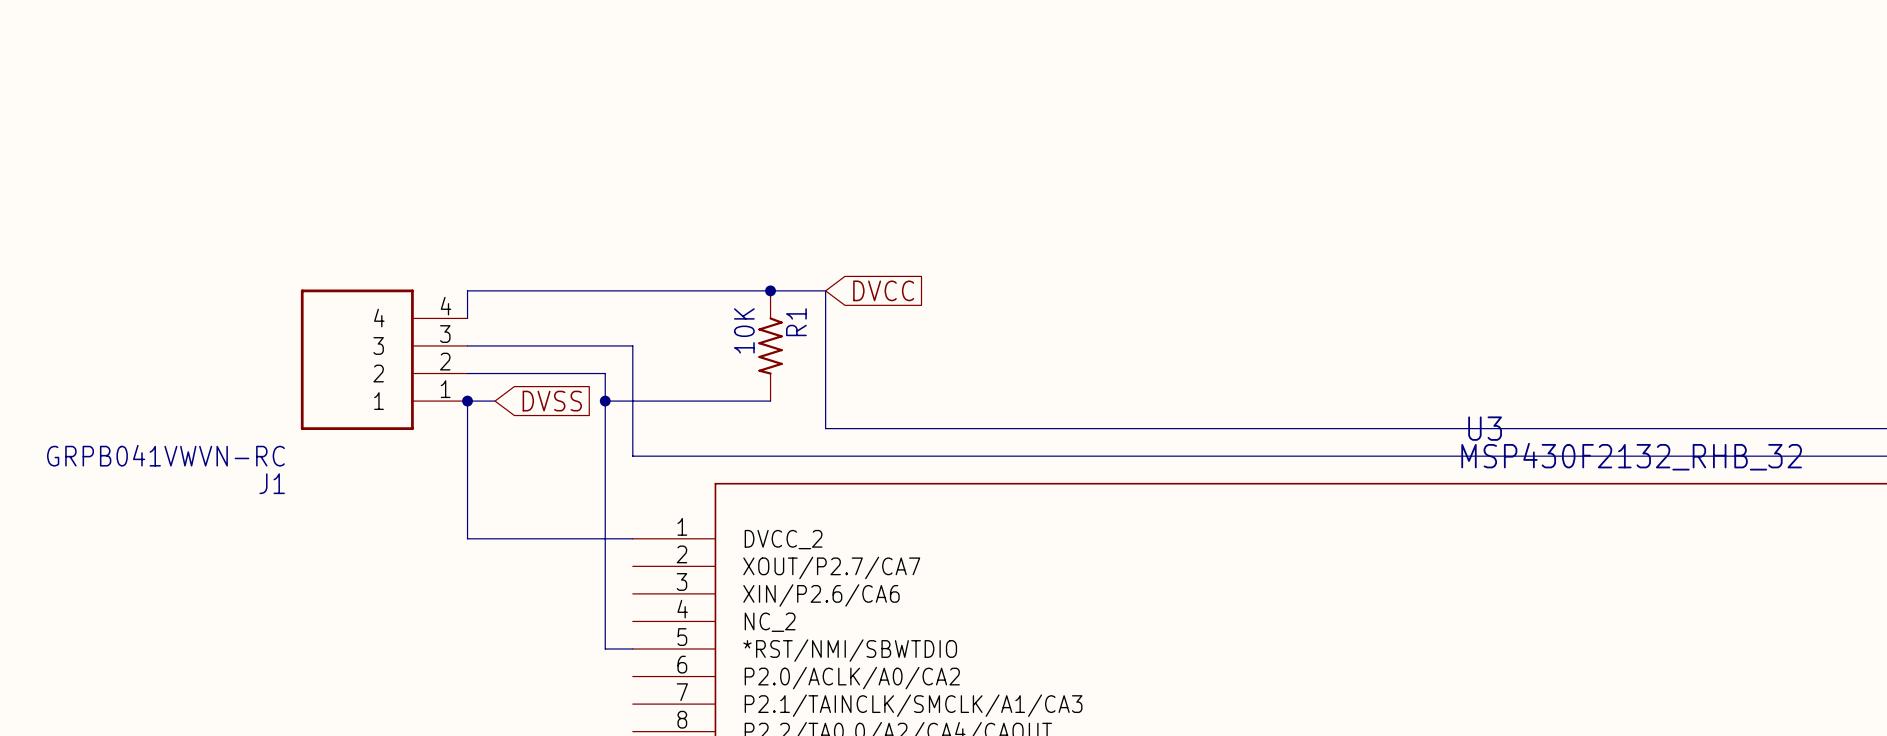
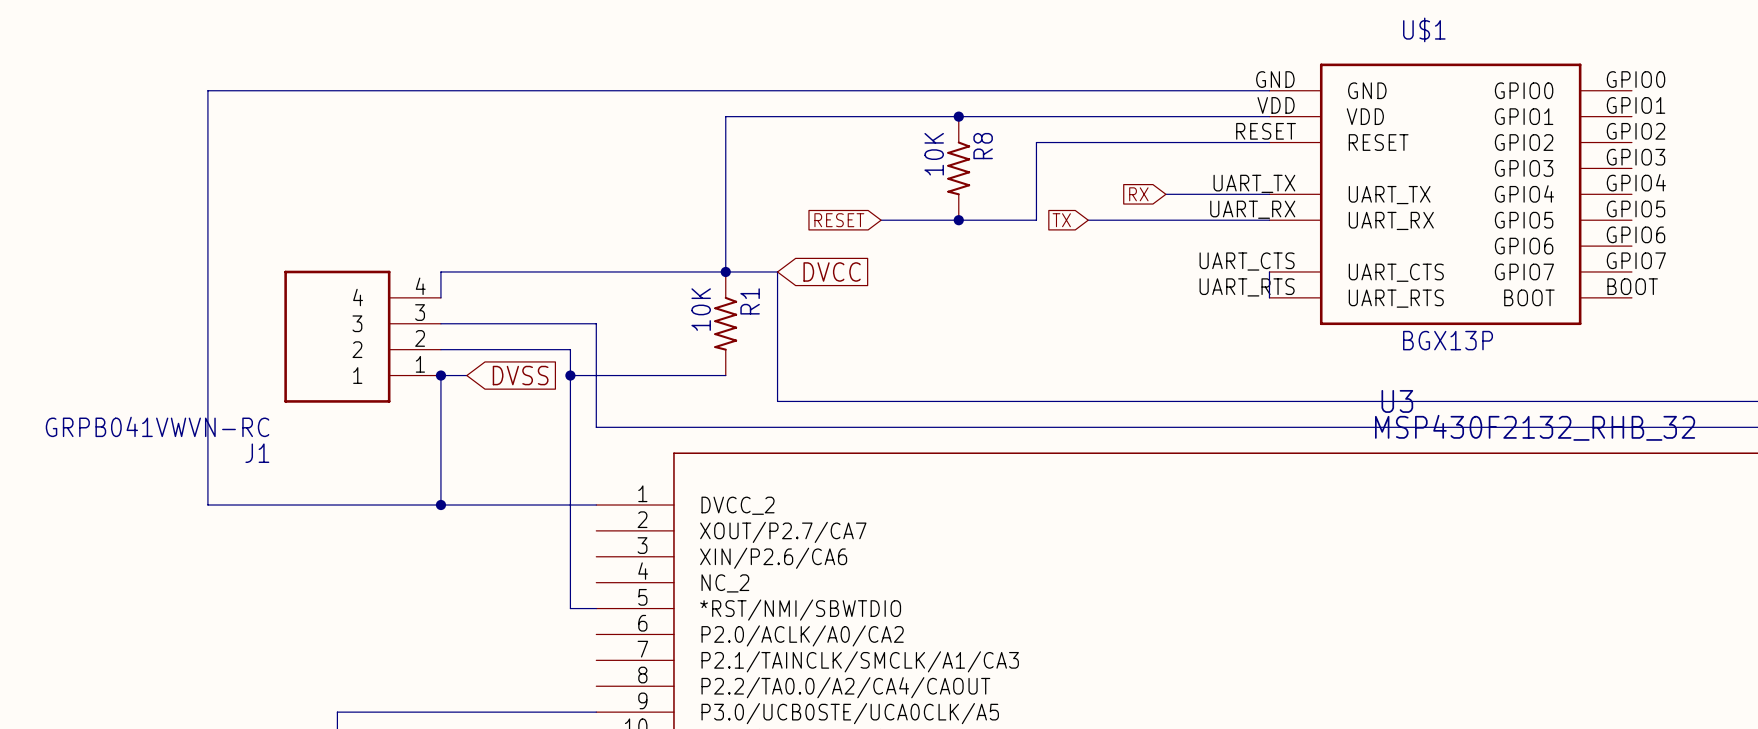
wire: none -> (1269, 90) (207, 90) (207, 505) (440, 505)
junction: none -> (958, 116)
wire: none -> (1269, 116) (725, 116) (725, 271)
wire: none -> (1269, 142) (1036, 142) (1036, 220) (881, 220)
R8: none -> 10K (958, 168)
global label: none -> RX (1138, 194)
wire: none -> (1165, 194) (1269, 194)
U$1: none -> BGX13P (1450, 194)
global label: none -> RESET (839, 220)
junction: none -> (958, 220)
global label: none -> TX (1061, 220)
wire: none -> (1088, 220) (1269, 220)
wire: none -> (1269, 271) (1269, 297)
junction: none -> (440, 505)

